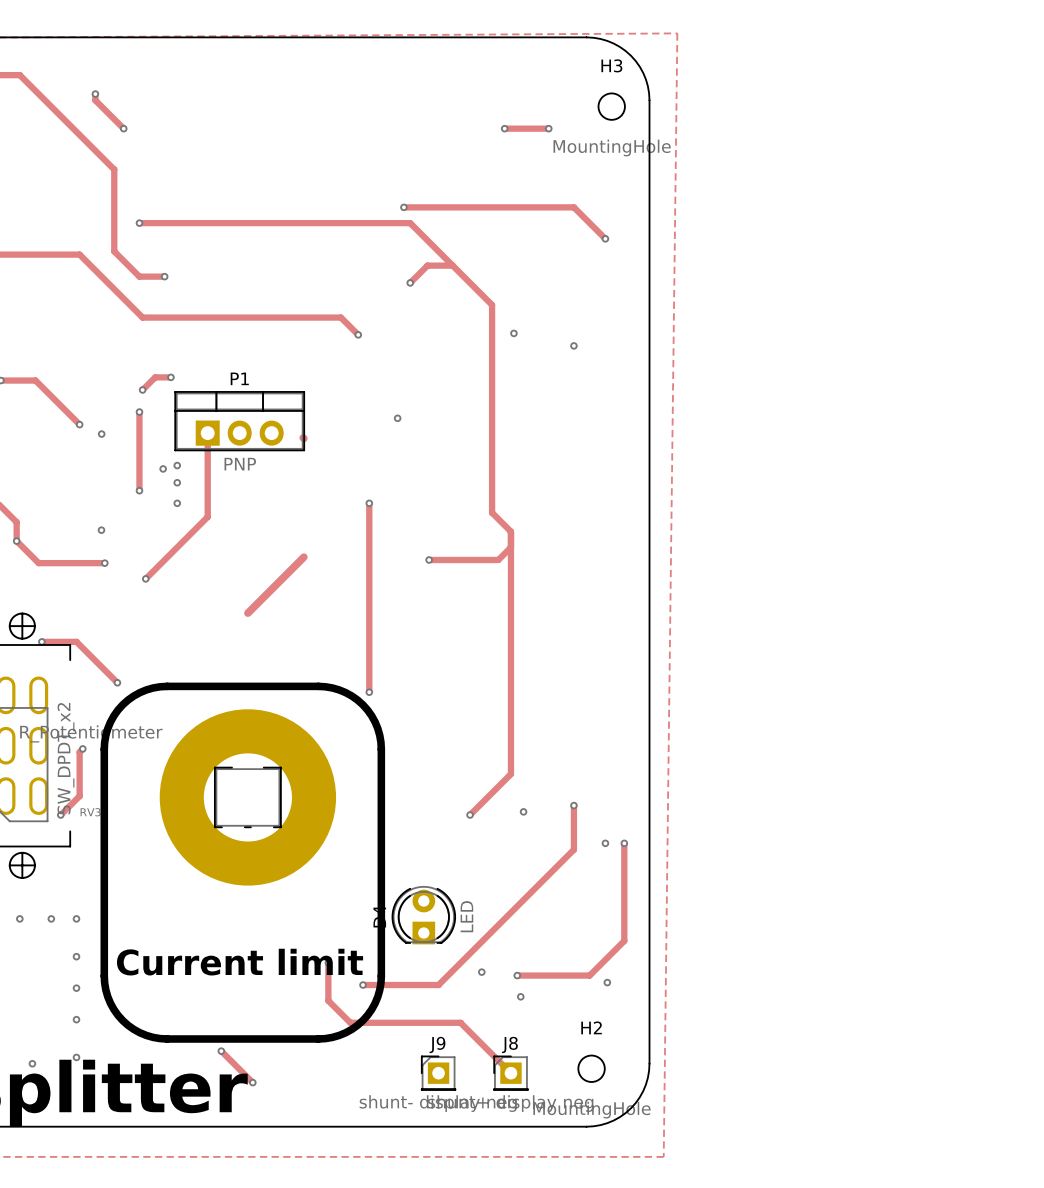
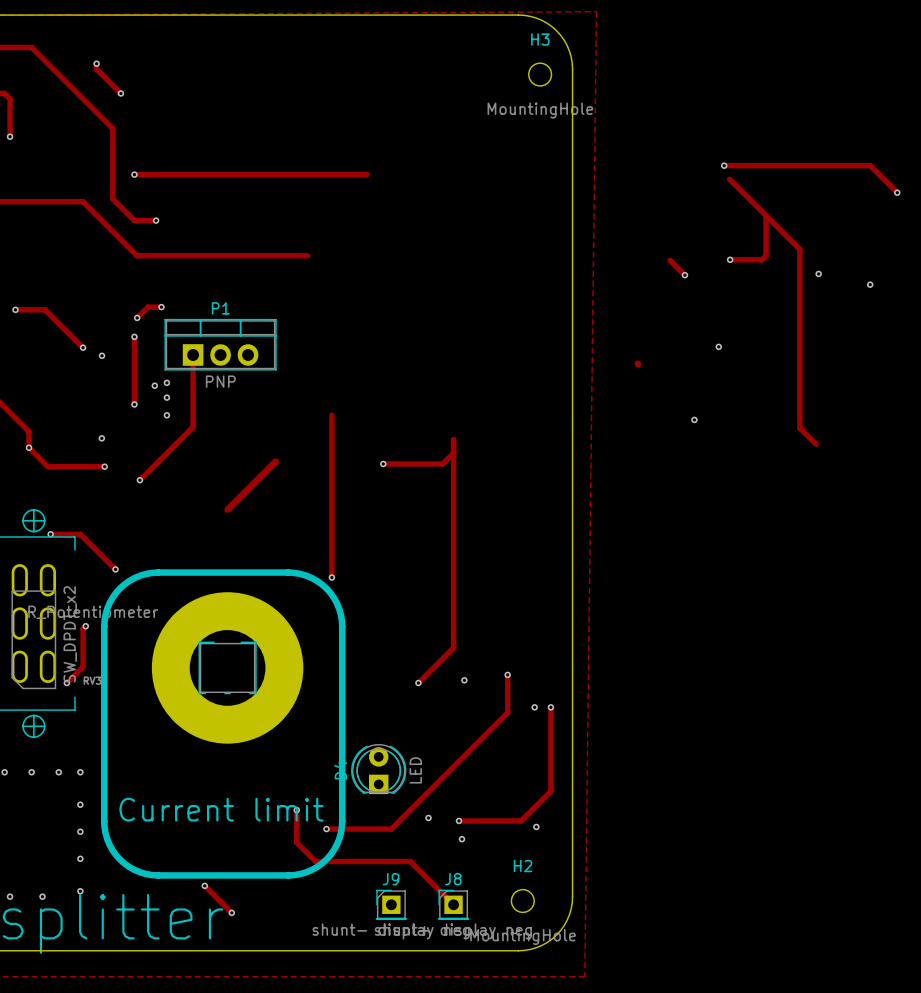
track: (504, 128) (548, 128) -> none
via: (504, 128) -> none
via: (548, 128) -> none
track: (403, 207) (573, 207) (605, 238) -> none
via: (403, 207) -> none
track: none -> (724, 165) (870, 165) (897, 192)
via: none -> (724, 165)
track: (410, 223) (492, 304) (492, 512) (510, 531) -> none
track: none -> (729, 179) (799, 249) (799, 428) (816, 444)
via: (605, 238) -> none
via: none -> (897, 192)
track: (452, 265) (427, 265) (410, 282) -> none
track: none -> (766, 215) (766, 255) (762, 259) (730, 259)
via: (410, 282) -> none
track: (340, 317) (358, 334) -> none
track: none -> (670, 260) (684, 275)
via: none -> (730, 259)
via: (513, 333) -> none
via: (358, 334) -> none
via: none -> (818, 273)
via: none -> (684, 275)
via: (573, 345) -> none
via: none -> (870, 284)
via: (397, 418) -> none
via: none -> (718, 346)
track: (303, 437) (303, 438) -> none
track: none -> (637, 363) (638, 364)
via: (369, 503) -> none
via: none -> (694, 419)

